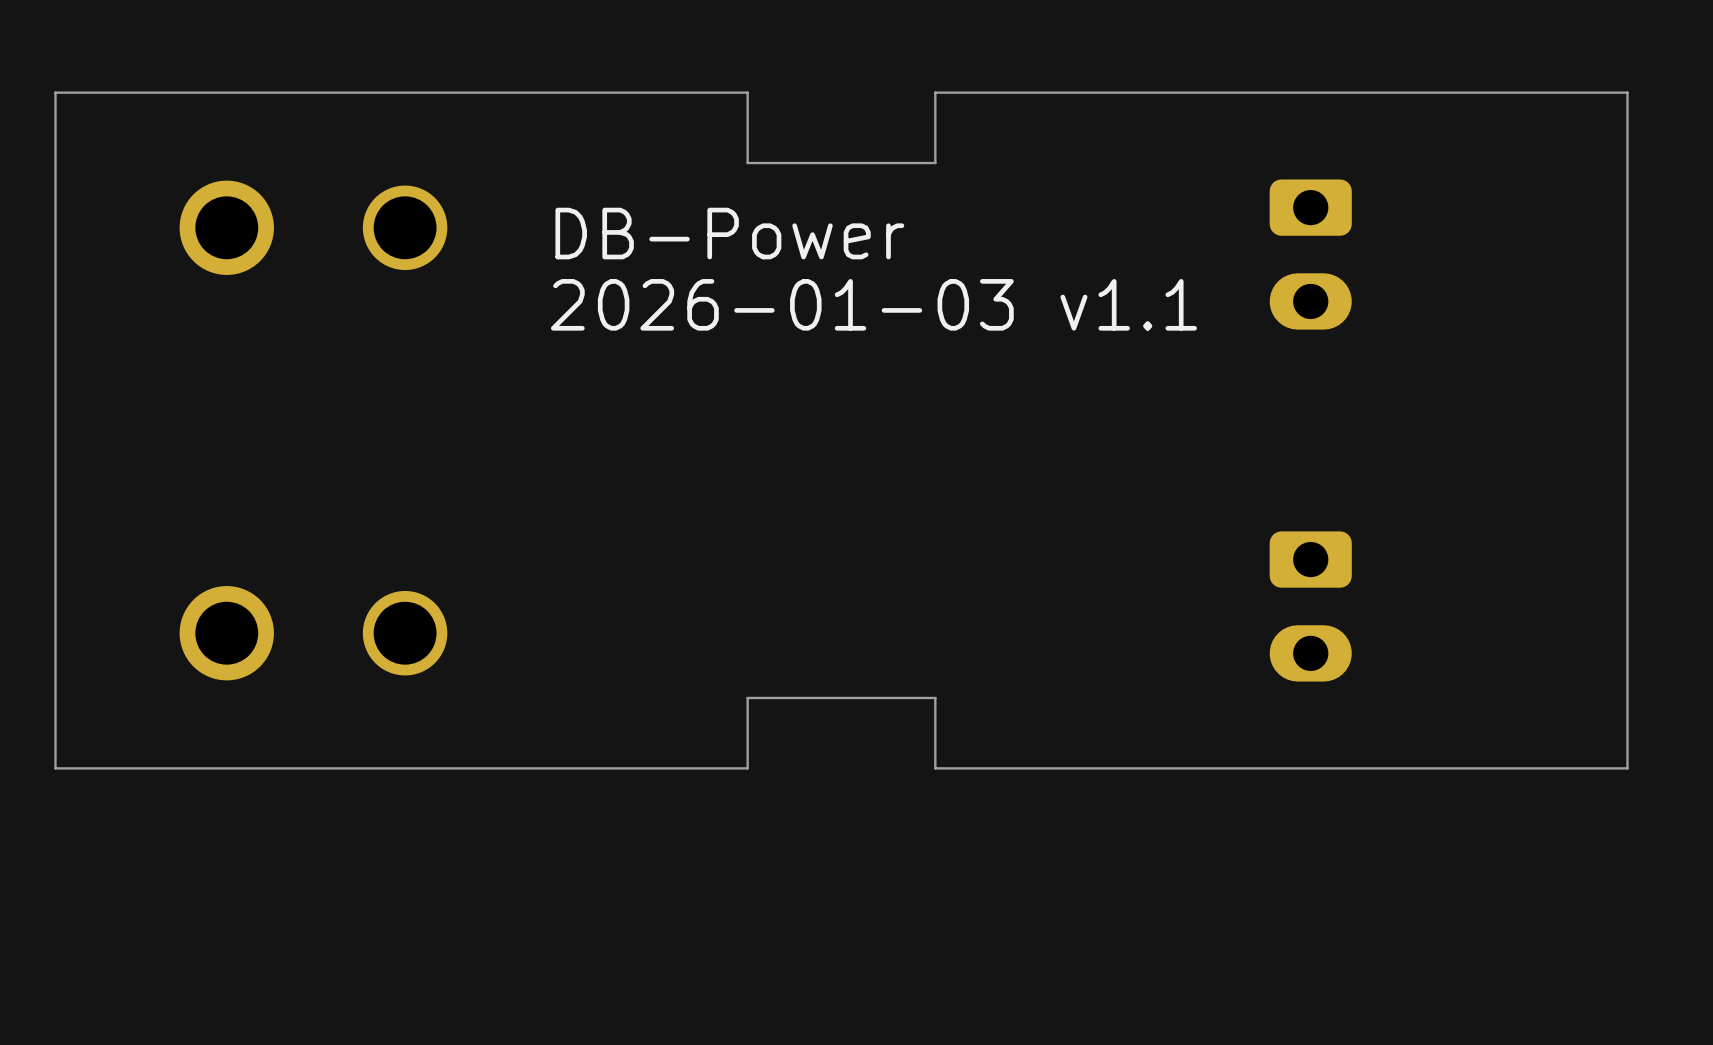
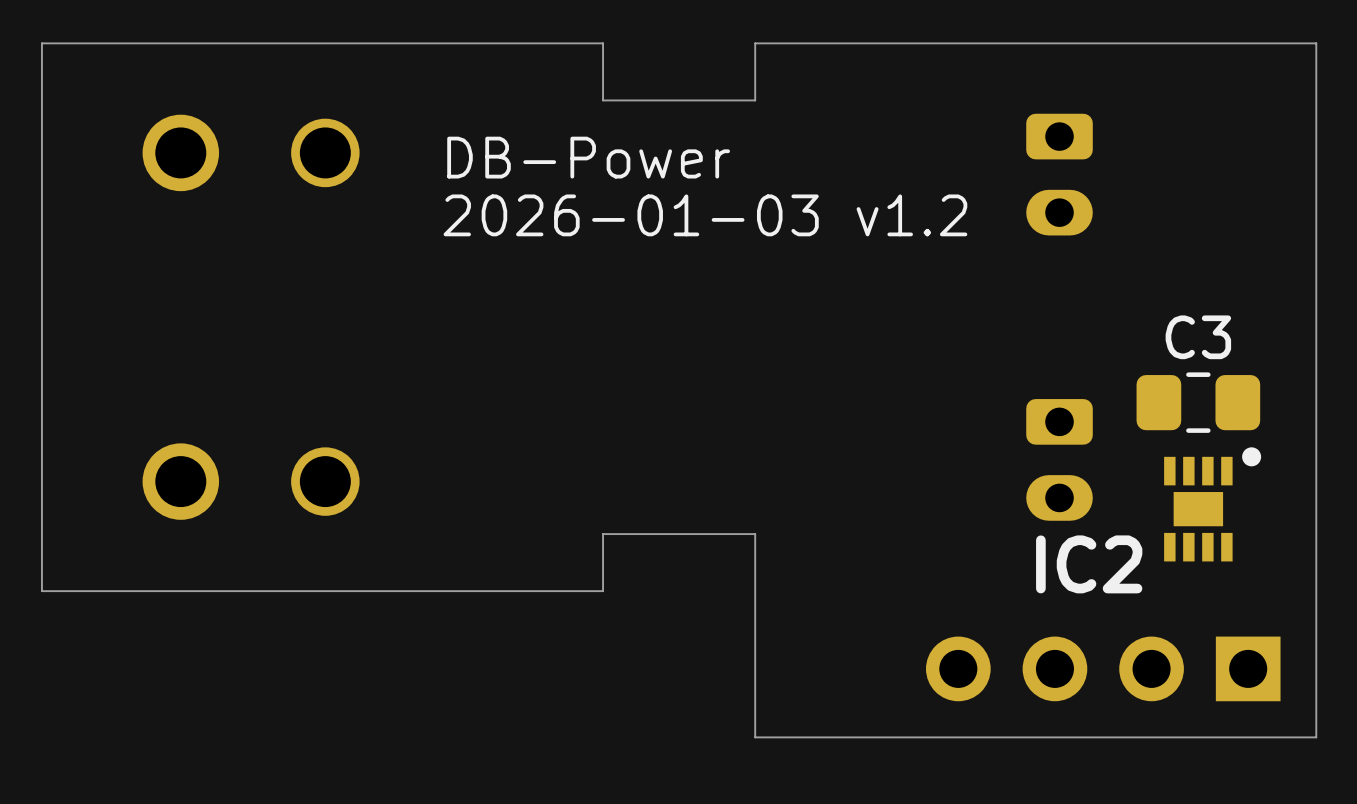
text: 2026-01-03 v1.1 (873, 304) -> 2026-01-03 v1.2 (705, 215)
C3: none -> (1198, 402)
IC2: none -> (1212, 504)
board edge: (1627, 768) (935, 768) -> (1316, 591) (1316, 737) (755, 737) (755, 591)
part: none -> (1103, 668)

